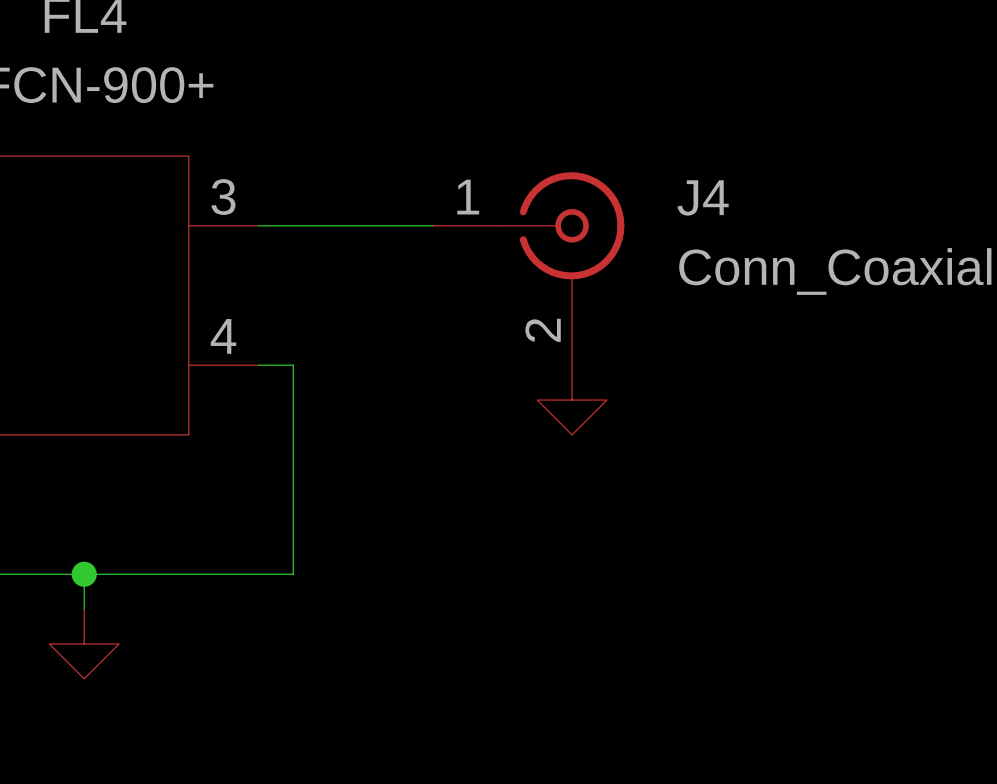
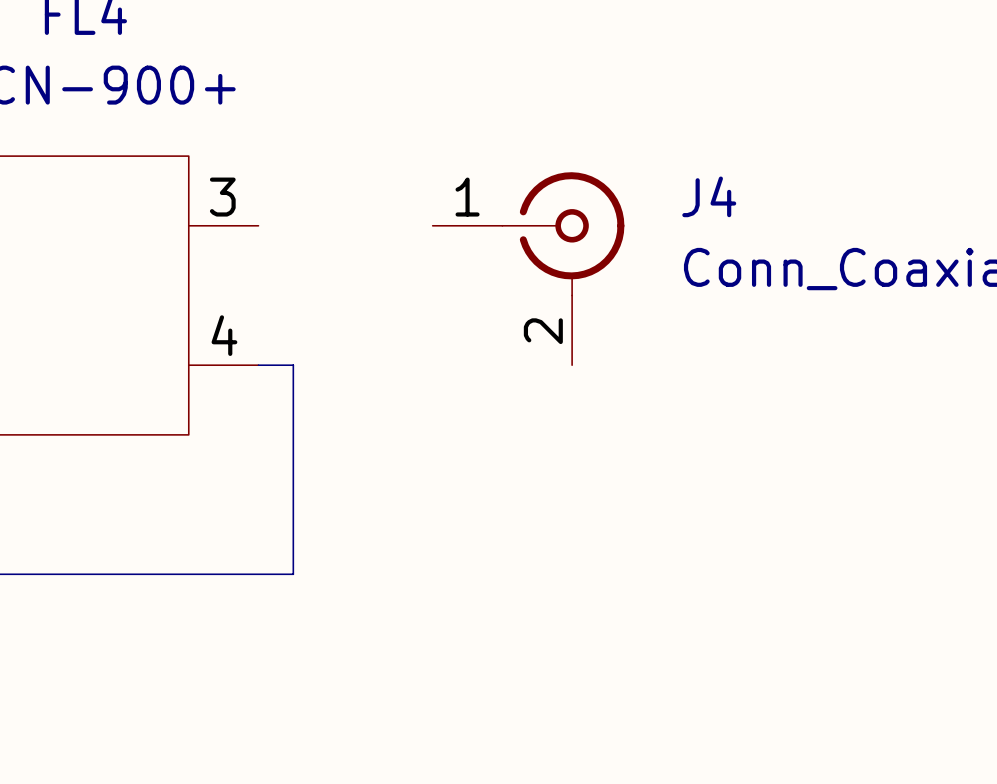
wire: (258, 225) (432, 225) -> none
power symbol: (572, 400) -> none
wire: (84, 574) (84, 609) -> none
junction: (84, 574) -> none
power symbol: (84, 643) -> none

